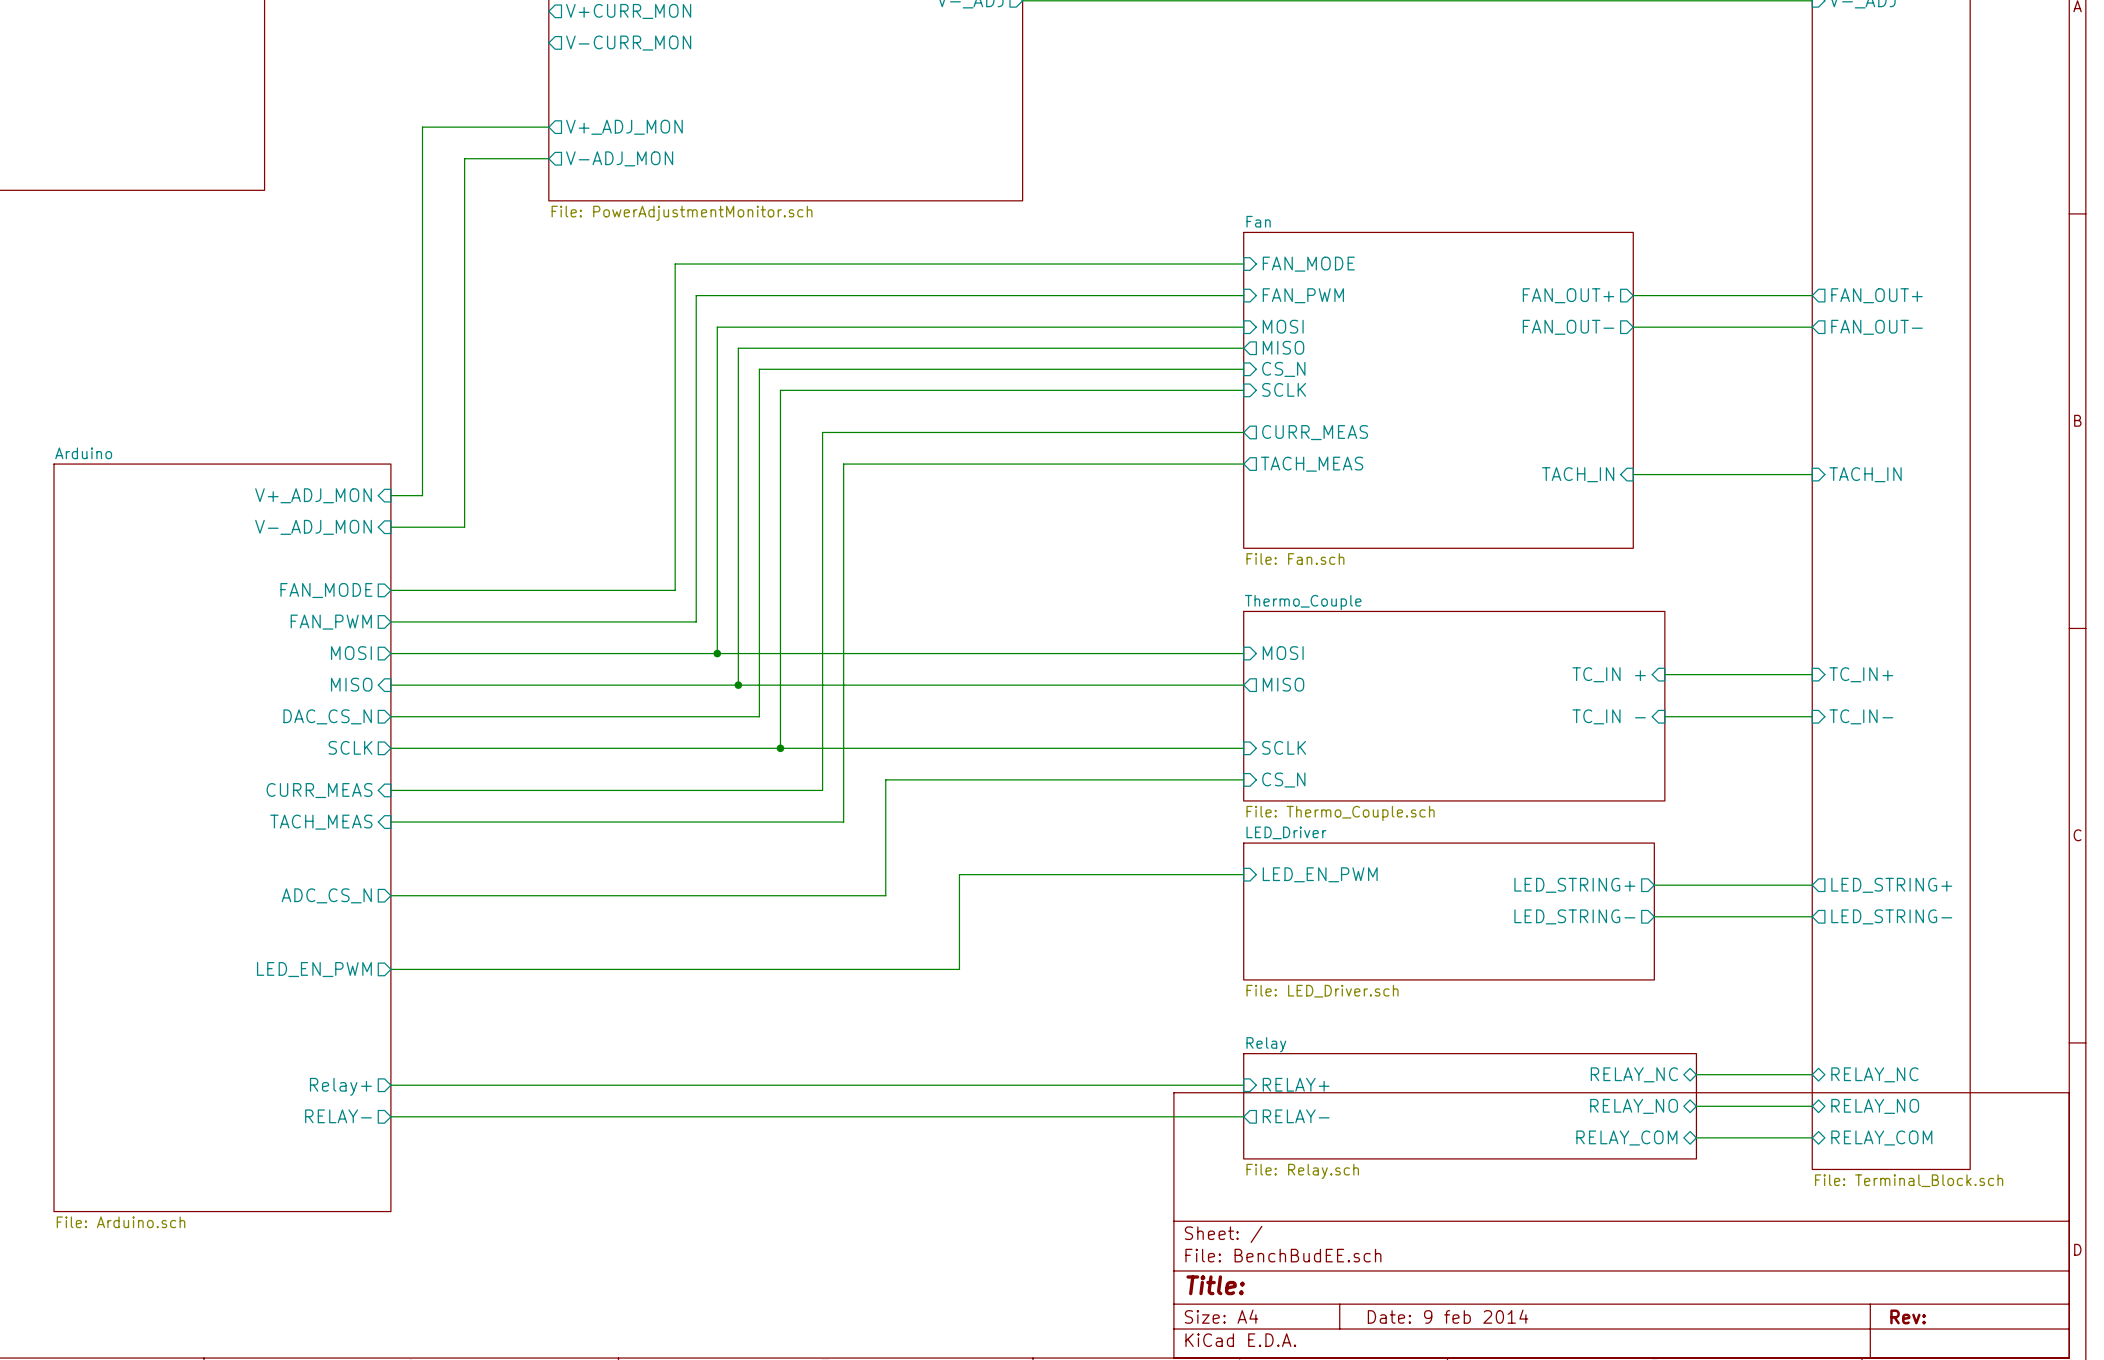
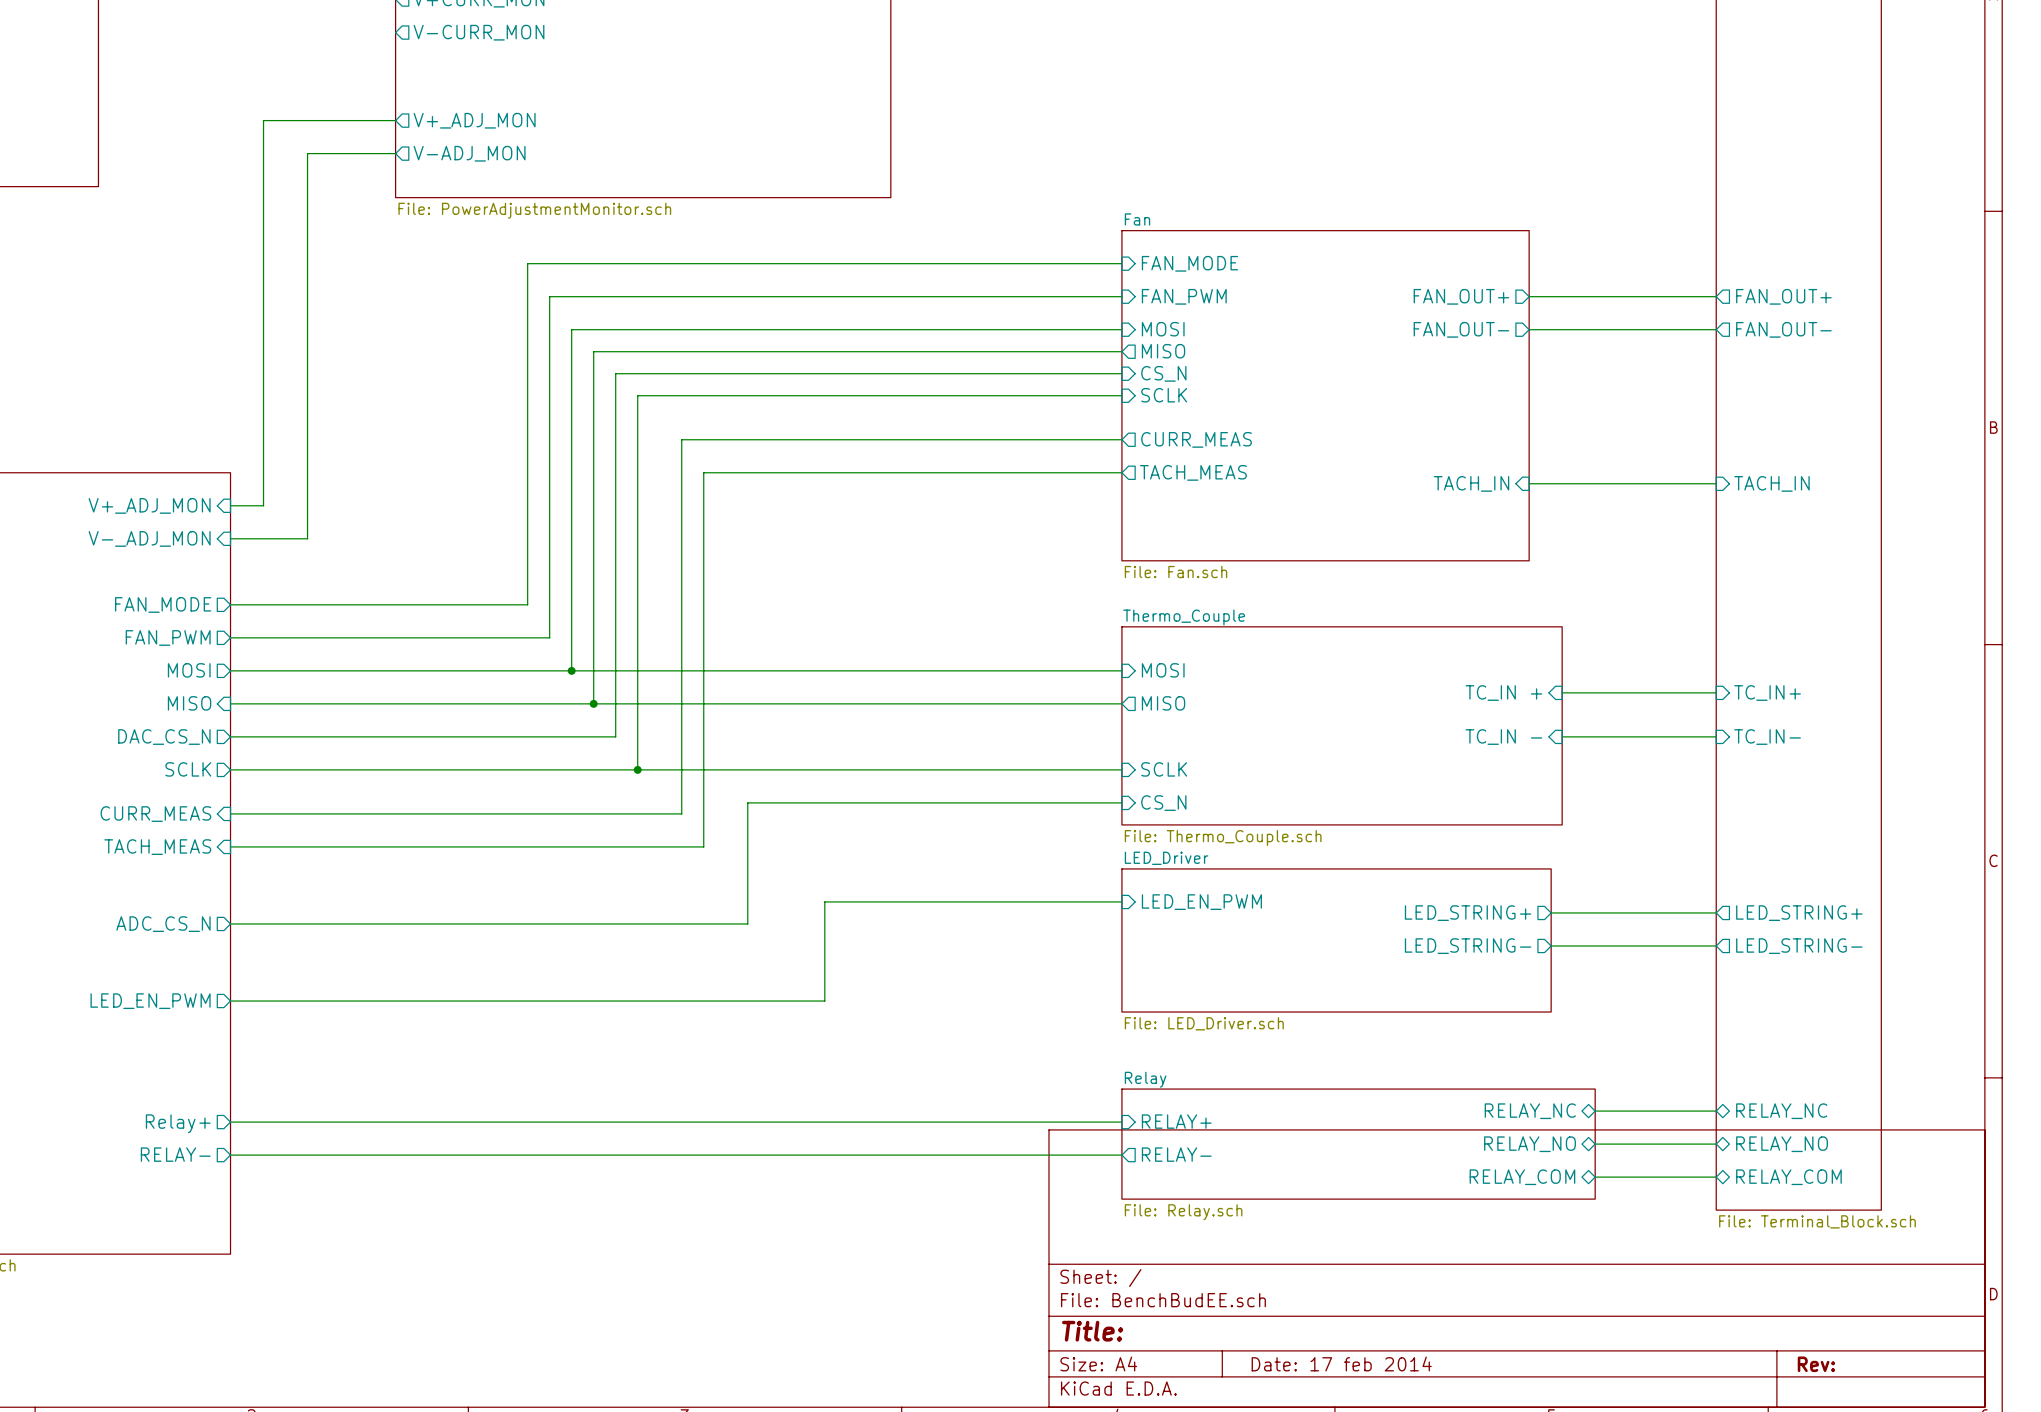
title block: Date: 9 feb 2014 (1448, 1316) -> Date: 17 feb 2014 (1341, 1363)

